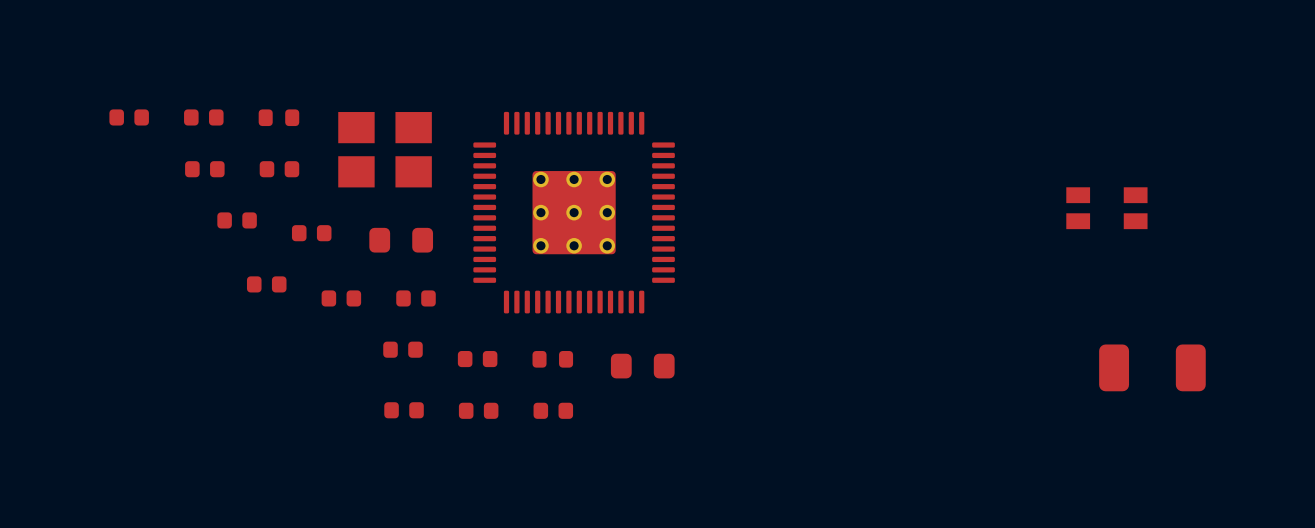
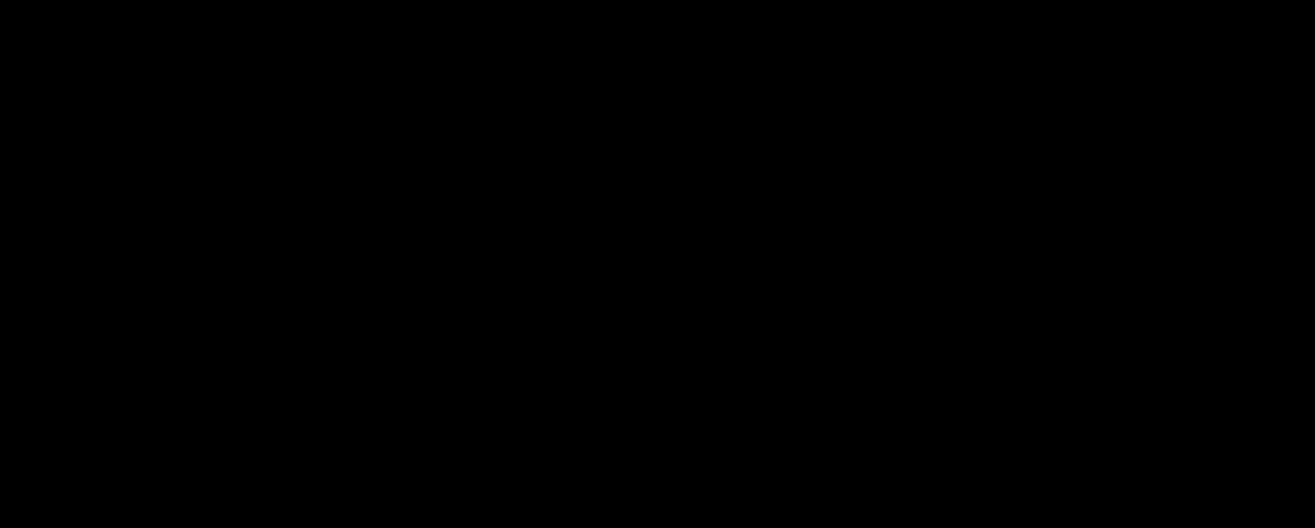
part: (129, 117) -> none
part: (203, 117) -> none
part: (278, 117) -> none
part: (385, 149) -> none
part: (204, 169) -> none
part: (279, 169) -> none
part: (1106, 208) -> none
part: (574, 212) -> none
part: (237, 220) -> none
part: (311, 233) -> none
part: (401, 240) -> none
part: (266, 284) -> none
part: (341, 298) -> none
part: (416, 298) -> none
part: (402, 349) -> none
part: (477, 359) -> none
part: (552, 359) -> none
part: (642, 366) -> none
part: (1152, 367) -> none
part: (404, 410) -> none
part: (478, 410) -> none
part: (553, 410) -> none

